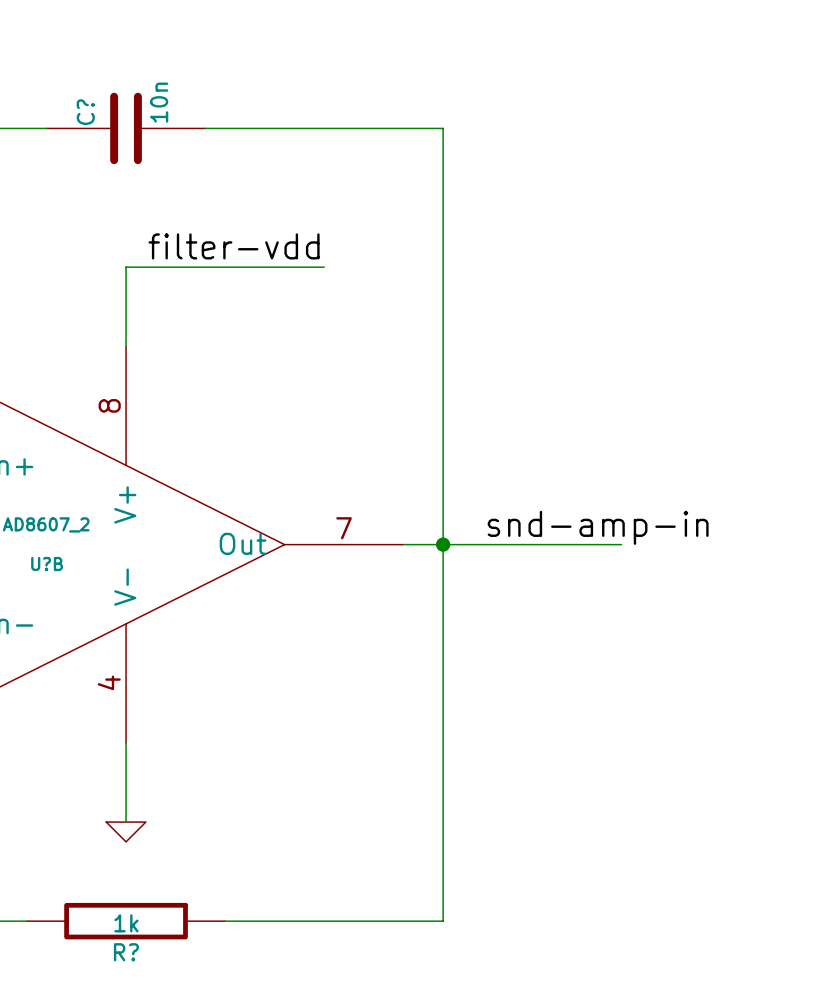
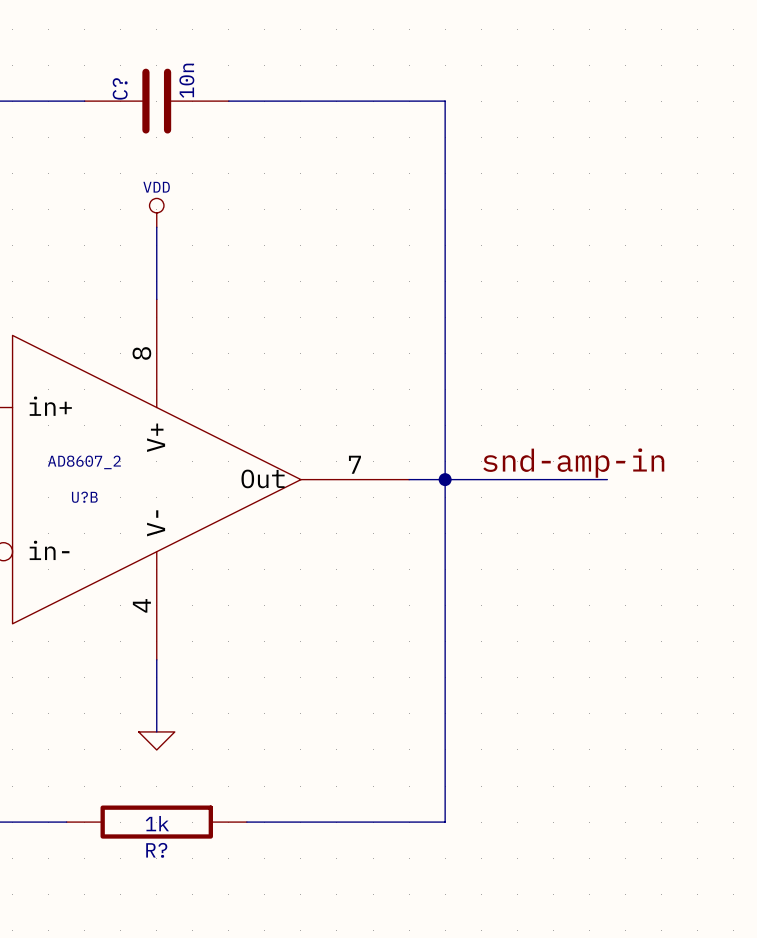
label: filter-vdd (234, 246) -> none
power symbol: none -> VDD (156, 212)
wire: (126, 267) (324, 267) -> none

